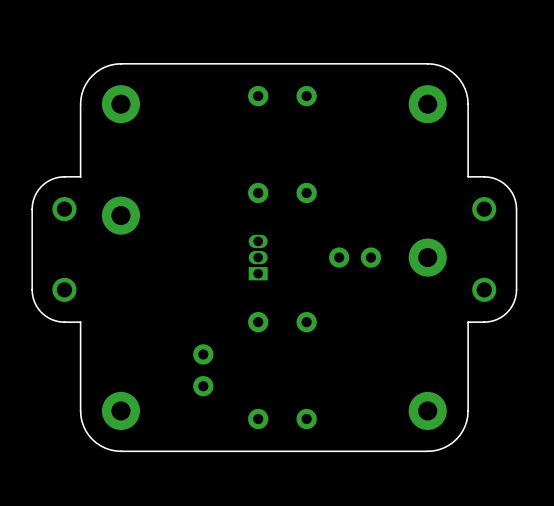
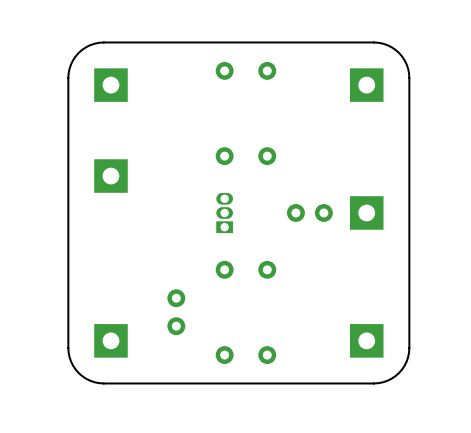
part footprint: [101, 85, 141, 124] -> [94, 68, 128, 102]
part footprint: [408, 85, 447, 124] -> [349, 68, 384, 102]
board edge: (80, 176) (60, 177) (48, 181) (36, 192) (32, 209) (32, 289) (34, 302) (41, 312) (52, 319) (80, 322) -> (68, 141) (68, 269)
board edge: (468, 176) (488, 177) (500, 181) (512, 192) (516, 209) (516, 289) (514, 302) (507, 312) (496, 319) (468, 322) -> (409, 141) (409, 269)
part footprint: [101, 196, 141, 235] -> [94, 159, 128, 193]
part: (64, 209) -> none
part: (484, 209) -> none
part footprint: [408, 238, 447, 277] -> [349, 196, 384, 230]
part: (64, 289) -> none
part: (484, 289) -> none
part footprint: [101, 391, 141, 431] -> [94, 324, 128, 358]
part footprint: [408, 391, 447, 431] -> [349, 324, 384, 358]

